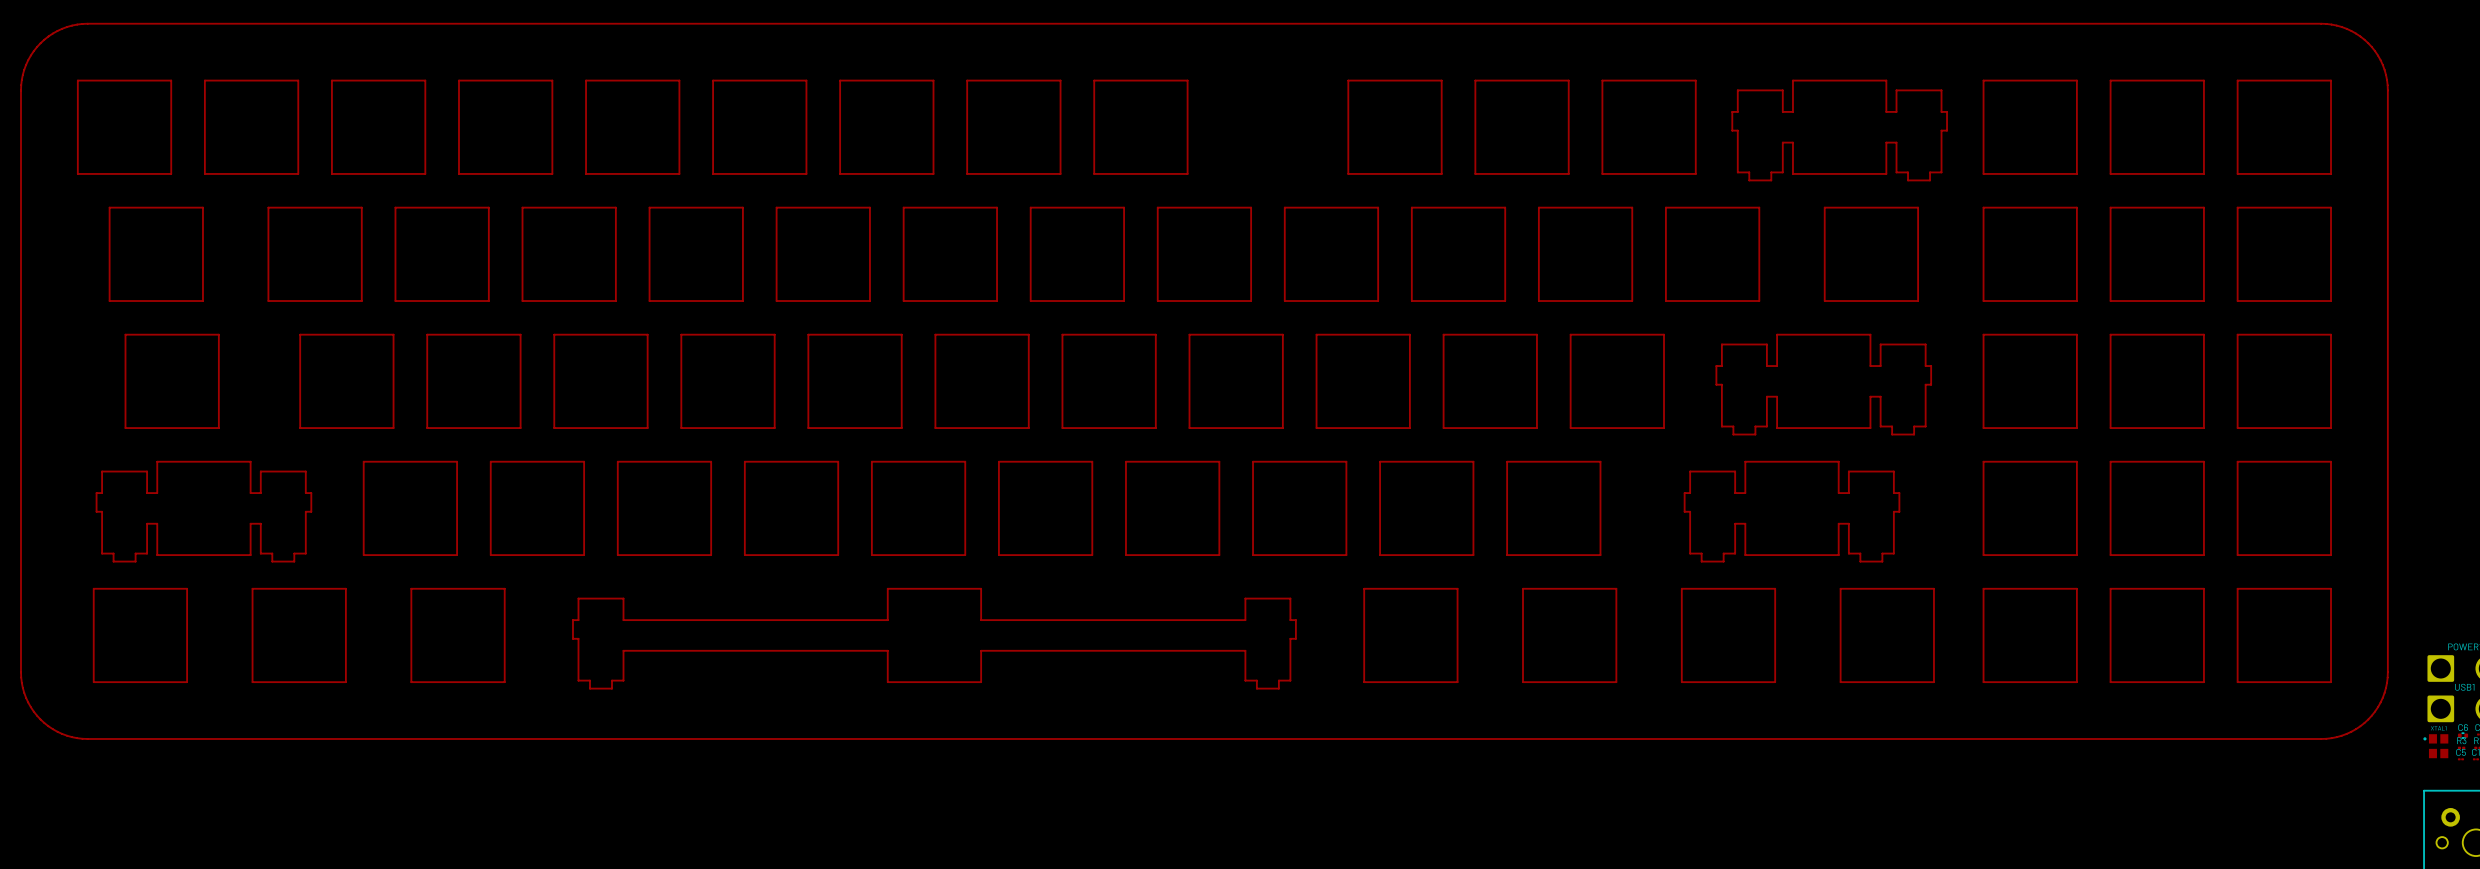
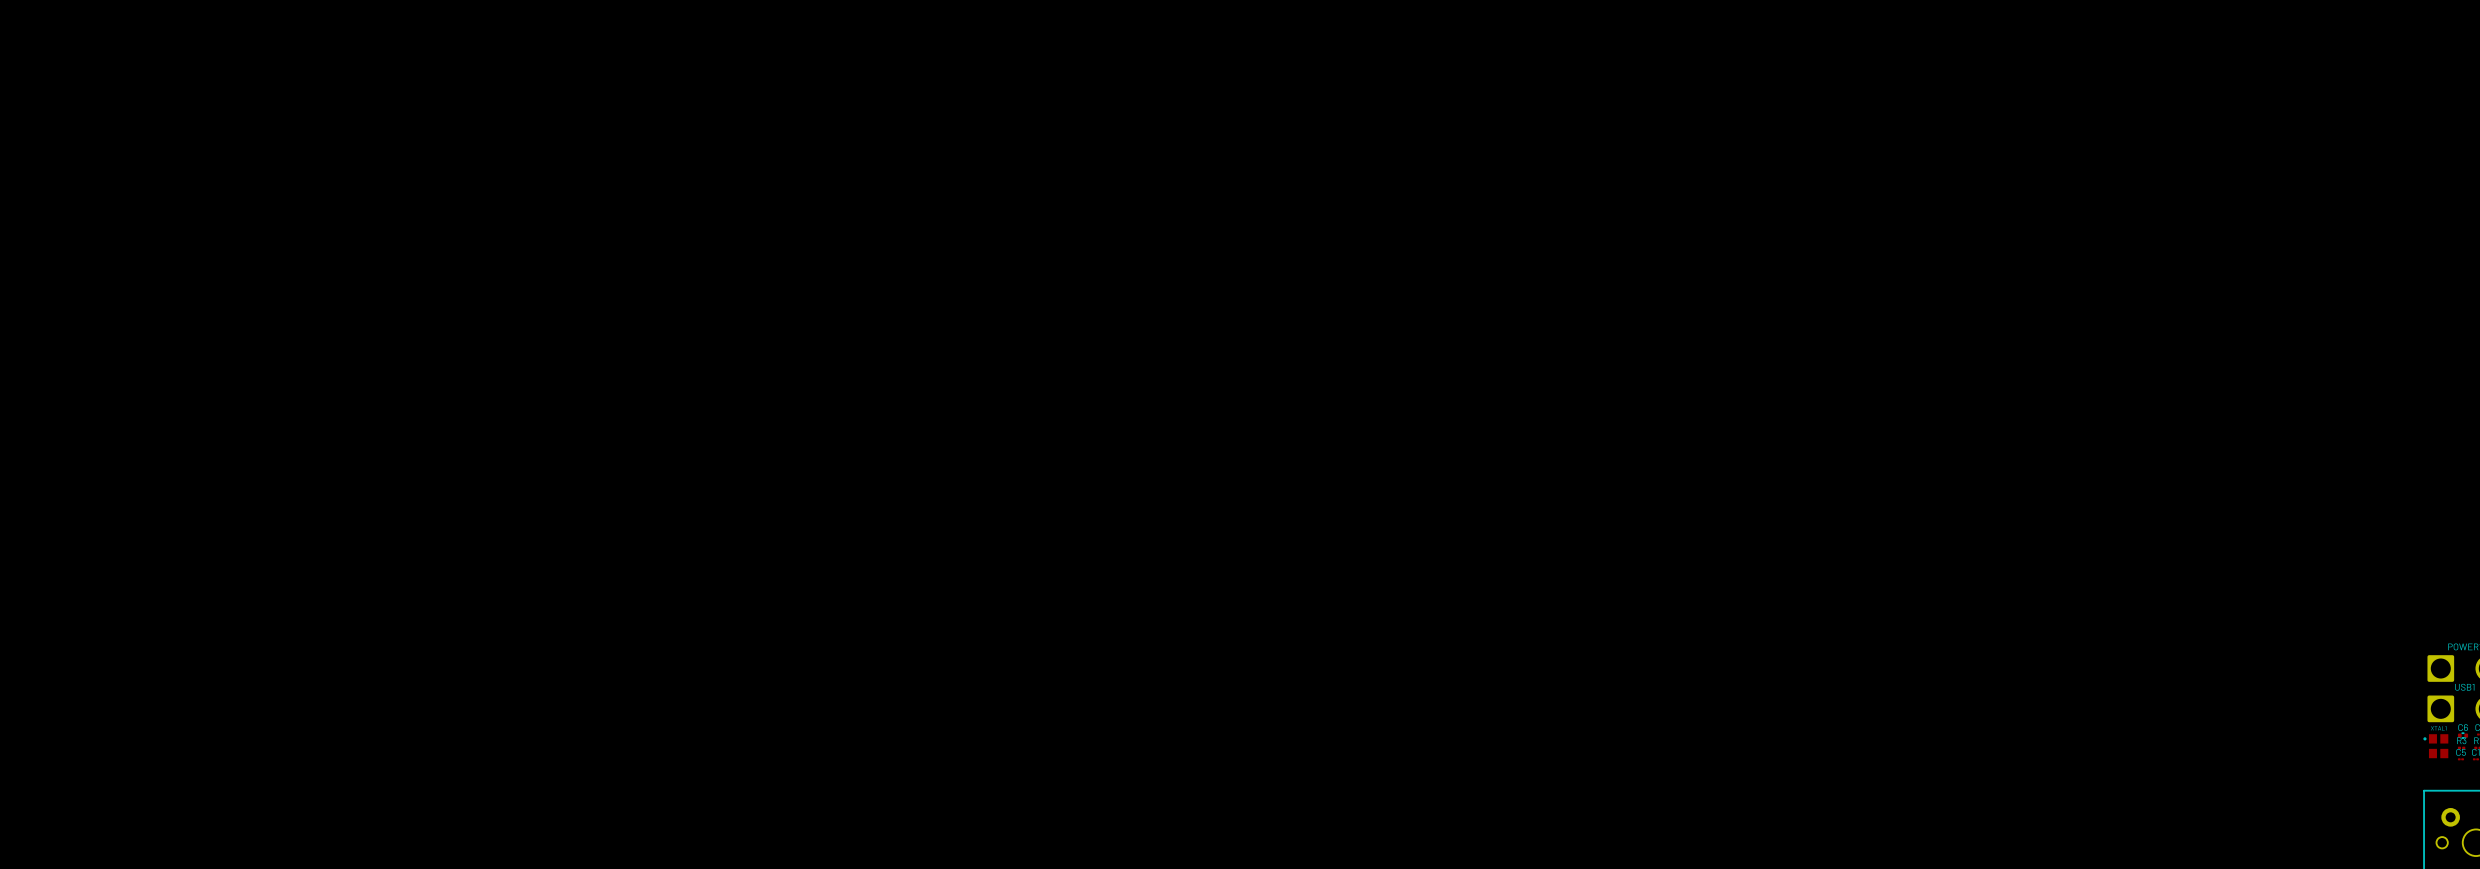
track: (87, 23) (2321, 23) (2341, 27) (2360, 36) (2371, 47) (2382, 64) (2387, 85) (2387, 672) (2384, 692) (2375, 711) (2360, 726) (2341, 735) (2321, 739) (87, 739) (67, 735) (48, 726) (33, 711) (24, 692) (21, 677) (21, 90) (26, 64) (40, 43) (62, 28) (87, 23) -> none
track: (77, 80) (171, 80) (171, 173) (77, 173) (77, 80) -> none
track: (204, 80) (298, 80) (298, 173) (204, 173) (204, 80) -> none
track: (331, 80) (425, 80) (425, 173) (331, 173) (331, 80) -> none
track: (458, 80) (552, 80) (552, 173) (458, 173) (458, 80) -> none
track: (586, 80) (679, 80) (679, 173) (586, 173) (586, 80) -> none
track: (713, 80) (806, 80) (806, 173) (713, 173) (713, 80) -> none
track: (840, 80) (933, 80) (933, 173) (840, 173) (840, 80) -> none
track: (967, 80) (1060, 80) (1060, 173) (967, 173) (967, 80) -> none
track: (1094, 80) (1187, 80) (1187, 173) (1094, 173) (1094, 80) -> none
track: (1348, 80) (1441, 80) (1441, 173) (1348, 173) (1348, 80) -> none
track: (1475, 80) (1568, 80) (1568, 173) (1475, 173) (1475, 80) -> none
track: (1602, 80) (1695, 80) (1695, 173) (1602, 173) (1602, 80) -> none
track: (1792, 80) (1886, 80) (1886, 111) (1896, 111) (1896, 90) (1941, 90) (1941, 111) (1947, 111) (1947, 130) (1941, 130) (1941, 172) (1930, 172) (1930, 180) (1908, 180) (1908, 172) (1896, 172) (1896, 142) (1886, 142) (1886, 173) (1792, 173) (1792, 142) (1782, 142) (1782, 172) (1771, 172) (1771, 180) (1749, 180) (1749, 172) (1737, 172) (1737, 130) (1732, 130) (1732, 111) (1737, 111) (1737, 90) (1782, 90) (1782, 111) (1792, 111) (1792, 80) -> none
track: (1983, 80) (2076, 80) (2076, 173) (1983, 173) (1983, 80) -> none
track: (2110, 80) (2110, 173) (2203, 173) (2203, 80) (2110, 80) -> none
track: (2237, 80) (2237, 173) (2331, 173) (2331, 80) (2237, 80) -> none
track: (109, 207) (202, 207) (202, 301) (109, 301) (109, 207) -> none
track: (268, 207) (361, 207) (361, 301) (268, 301) (268, 207) -> none
track: (395, 207) (488, 207) (488, 301) (395, 301) (395, 207) -> none
track: (522, 207) (615, 207) (615, 301) (522, 301) (522, 207) -> none
track: (649, 207) (742, 207) (742, 301) (649, 301) (649, 207) -> none
track: (776, 207) (869, 207) (869, 301) (776, 301) (776, 207) -> none
track: (903, 207) (997, 207) (997, 301) (903, 301) (903, 207) -> none
track: (1030, 207) (1124, 207) (1124, 301) (1030, 301) (1030, 207) -> none
track: (1157, 207) (1251, 207) (1251, 301) (1157, 301) (1157, 207) -> none
track: (1284, 207) (1378, 207) (1378, 301) (1284, 301) (1284, 207) -> none
track: (1411, 207) (1505, 207) (1505, 301) (1411, 301) (1411, 207) -> none
track: (1538, 207) (1632, 207) (1632, 301) (1538, 301) (1538, 207) -> none
track: (1665, 207) (1759, 207) (1759, 301) (1665, 301) (1665, 207) -> none
track: (1824, 207) (1918, 207) (1918, 301) (1824, 301) (1824, 207) -> none
track: (1983, 207) (2076, 207) (2076, 301) (1983, 301) (1983, 207) -> none
track: (2110, 207) (2203, 207) (2203, 301) (2110, 301) (2110, 207) -> none
track: (2237, 207) (2237, 301) (2331, 301) (2331, 207) (2237, 207) -> none
track: (125, 334) (218, 334) (218, 428) (125, 428) (125, 334) -> none
track: (300, 334) (393, 334) (393, 428) (300, 428) (300, 334) -> none
track: (427, 334) (520, 334) (520, 428) (427, 428) (427, 334) -> none
track: (554, 334) (647, 334) (647, 428) (554, 428) (554, 334) -> none
track: (681, 334) (774, 334) (774, 428) (681, 428) (681, 334) -> none
track: (808, 334) (901, 334) (901, 428) (808, 428) (808, 334) -> none
track: (935, 334) (1028, 334) (1028, 428) (935, 428) (935, 334) -> none
track: (1062, 334) (1155, 334) (1155, 428) (1062, 428) (1062, 334) -> none
track: (1189, 334) (1282, 334) (1282, 428) (1189, 428) (1189, 334) -> none
track: (1316, 334) (1409, 334) (1409, 428) (1316, 428) (1316, 334) -> none
track: (1443, 334) (1536, 334) (1536, 428) (1443, 428) (1443, 334) -> none
track: (1570, 334) (1664, 334) (1664, 428) (1570, 428) (1570, 334) -> none
track: (1777, 334) (1870, 334) (1870, 366) (1880, 366) (1880, 344) (1925, 344) (1925, 366) (1931, 366) (1931, 384) (1925, 384) (1925, 426) (1914, 426) (1914, 434) (1892, 434) (1892, 426) (1880, 426) (1880, 396) (1870, 396) (1870, 428) (1777, 428) (1777, 396) (1766, 396) (1766, 426) (1755, 426) (1755, 434) (1733, 434) (1733, 426) (1721, 426) (1721, 384) (1716, 384) (1716, 366) (1721, 366) (1721, 344) (1766, 344) (1766, 366) (1777, 366) (1777, 334) -> none
track: (1983, 334) (2076, 334) (2076, 428) (1983, 428) (1983, 334) -> none
track: (2110, 334) (2203, 334) (2203, 428) (2110, 428) (2110, 334) -> none
track: (2237, 334) (2331, 334) (2331, 428) (2237, 428) (2237, 334) -> none
track: (157, 461) (250, 461) (250, 493) (260, 493) (260, 471) (305, 471) (305, 493) (311, 493) (311, 511) (305, 511) (305, 553) (294, 553) (294, 561) (272, 561) (272, 553) (260, 553) (260, 523) (250, 523) (250, 555) (157, 555) (157, 523) (147, 523) (147, 553) (135, 553) (135, 561) (113, 561) (113, 553) (102, 553) (102, 511) (96, 511) (96, 493) (102, 493) (102, 471) (147, 471) (147, 493) (157, 493) (157, 461) -> none
track: (363, 461) (457, 461) (457, 555) (363, 555) (363, 461) -> none
track: (490, 461) (584, 461) (584, 555) (490, 555) (490, 461) -> none
track: (617, 461) (711, 461) (711, 555) (617, 555) (617, 461) -> none
track: (744, 461) (838, 461) (838, 555) (744, 555) (744, 461) -> none
track: (871, 461) (965, 461) (965, 555) (871, 555) (871, 461) -> none
track: (998, 461) (1092, 461) (1092, 555) (998, 555) (998, 461) -> none
track: (1125, 461) (1219, 461) (1219, 555) (1125, 555) (1125, 461) -> none
track: (1253, 461) (1346, 461) (1346, 555) (1253, 555) (1253, 461) -> none
track: (1380, 461) (1473, 461) (1473, 555) (1380, 555) (1380, 461) -> none
track: (1507, 461) (1600, 461) (1600, 555) (1507, 555) (1507, 461) -> none
track: (1745, 461) (1838, 461) (1838, 493) (1848, 493) (1848, 471) (1893, 471) (1893, 493) (1899, 493) (1899, 511) (1893, 511) (1893, 553) (1882, 553) (1882, 561) (1860, 561) (1860, 553) (1848, 553) (1848, 523) (1838, 523) (1838, 555) (1745, 555) (1745, 523) (1735, 523) (1735, 553) (1723, 553) (1723, 561) (1701, 561) (1701, 553) (1690, 553) (1690, 511) (1684, 511) (1684, 493) (1690, 493) (1690, 471) (1735, 471) (1735, 493) (1745, 493) (1745, 461) -> none
track: (1983, 461) (2076, 461) (2076, 555) (1983, 555) (1983, 461) -> none
track: (2110, 461) (2110, 555) (2203, 555) (2203, 461) (2110, 461) -> none
track: (2237, 461) (2237, 555) (2331, 555) (2331, 461) (2237, 461) -> none
track: (93, 588) (187, 588) (187, 682) (93, 682) (93, 588) -> none
track: (252, 588) (345, 588) (345, 682) (252, 682) (252, 588) -> none
track: (411, 588) (504, 588) (504, 682) (411, 682) (411, 588) -> none
track: (887, 588) (981, 588) (981, 620) (1245, 620) (1245, 598) (1290, 598) (1290, 620) (1295, 620) (1295, 638) (1290, 638) (1290, 680) (1278, 680) (1278, 688) (1256, 688) (1256, 680) (1245, 680) (1245, 650) (981, 650) (981, 682) (887, 682) (887, 650) (623, 650) (623, 680) (612, 680) (612, 688) (589, 688) (589, 680) (578, 680) (578, 638) (572, 638) (572, 620) (578, 620) (578, 598) (623, 598) (623, 620) (887, 620) (887, 588) -> none
track: (1364, 588) (1457, 588) (1457, 682) (1364, 682) (1364, 588) -> none
track: (1522, 588) (1616, 588) (1616, 682) (1522, 682) (1522, 588) -> none
track: (1681, 588) (1775, 588) (1775, 682) (1681, 682) (1681, 588) -> none
track: (1840, 588) (1933, 588) (1933, 682) (1840, 682) (1840, 588) -> none
track: (1983, 588) (2076, 588) (2076, 682) (1983, 682) (1983, 588) -> none
track: (2110, 588) (2203, 588) (2203, 682) (2110, 682) (2110, 588) -> none
track: (2237, 588) (2237, 682) (2331, 682) (2331, 588) (2237, 588) -> none

